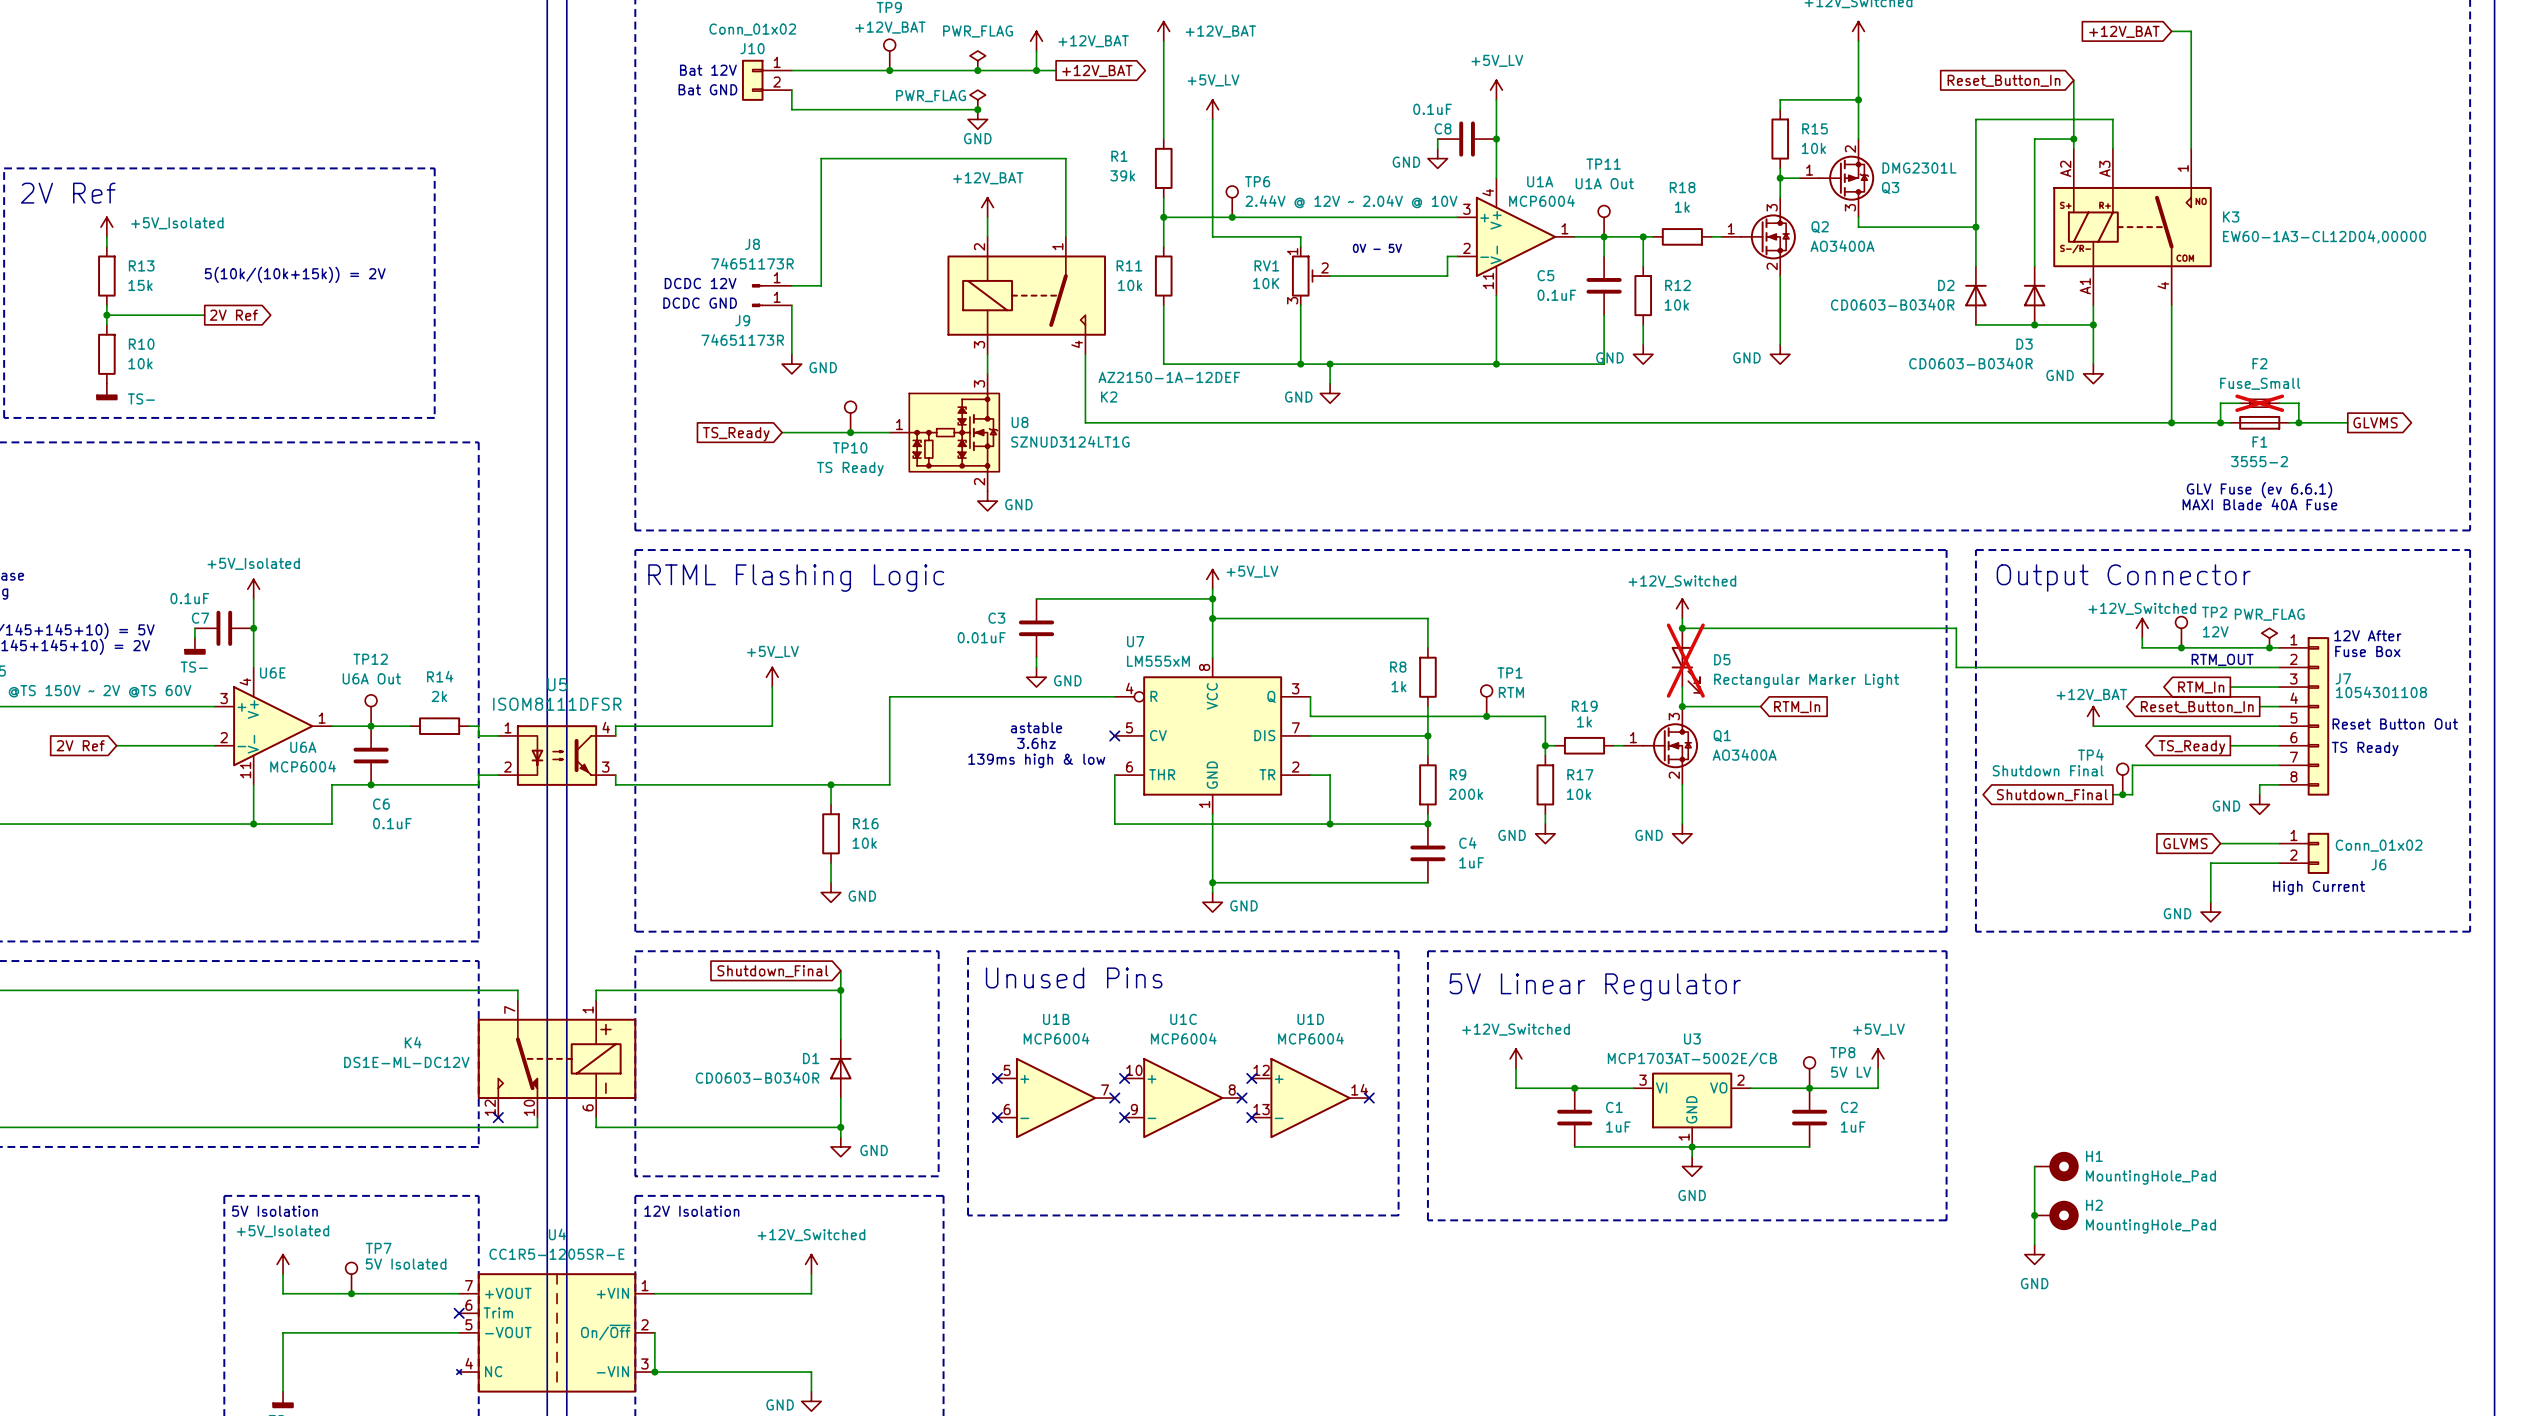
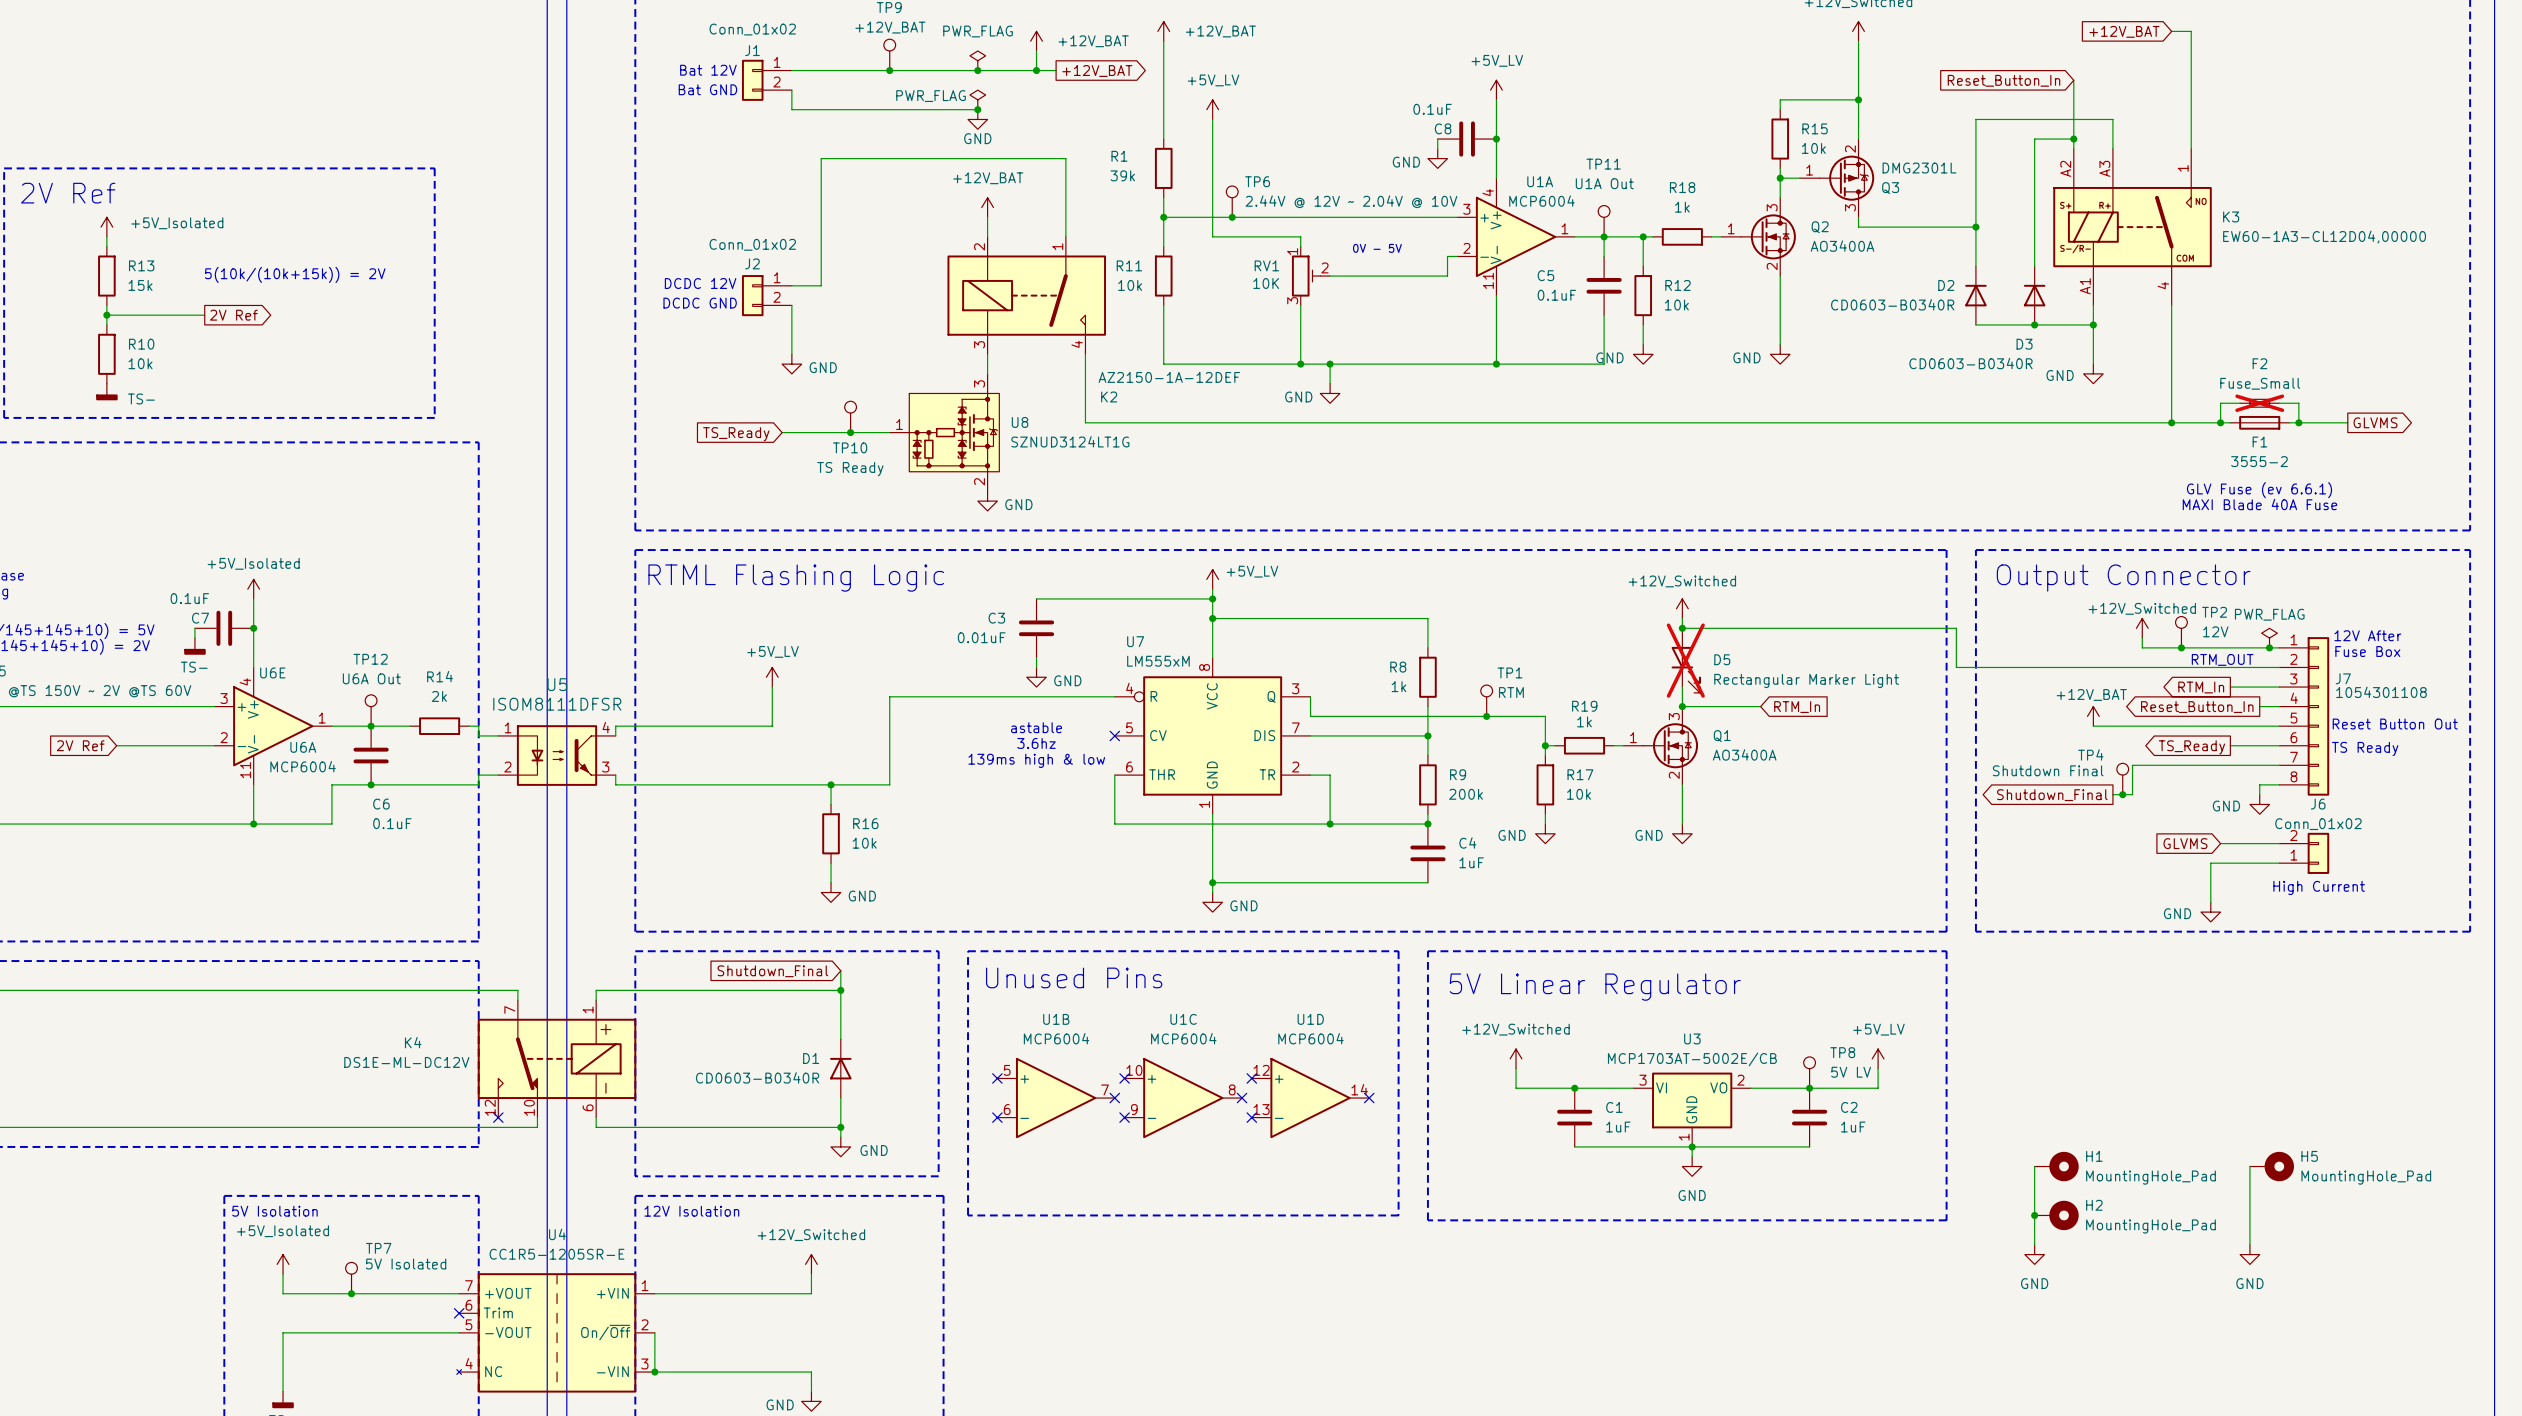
J10 name: J10 (752, 48) -> J1 (752, 50)
J8: 74651173R (772, 285) -> none
J2: none -> Conn_01x02 (766, 295)
J9: 74651173R (772, 305) -> none
J6 value position: Conn_01x02 (2379, 845) -> Conn_01x02 (2318, 824)
J6 flip: as is (2318, 853) -> up-down (2318, 853)
J6 name position: J6 (2378, 864) -> J6 (2318, 804)
wire: none -> (2249, 1166) (2249, 1244)
H5: none -> MountingHole_Pad (2271, 1166)
power symbol: none -> GND (2249, 1254)

